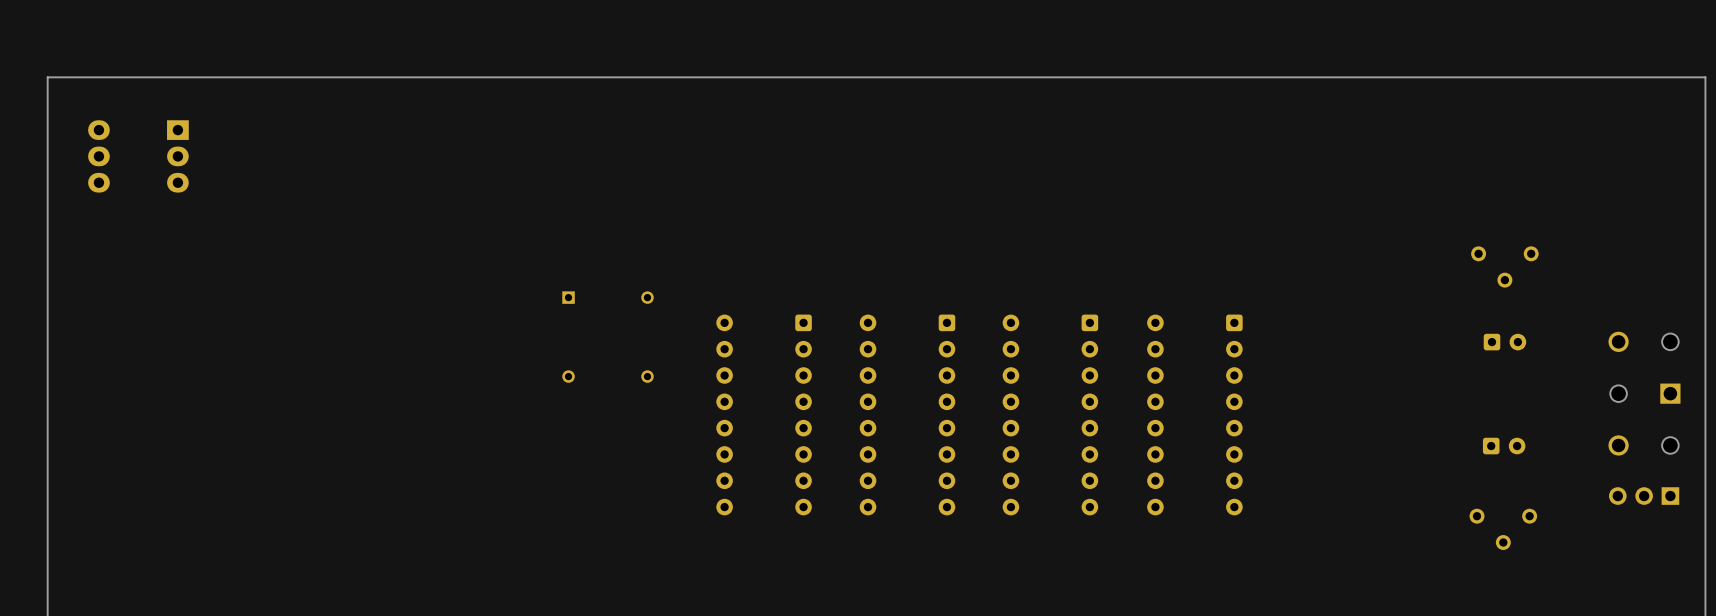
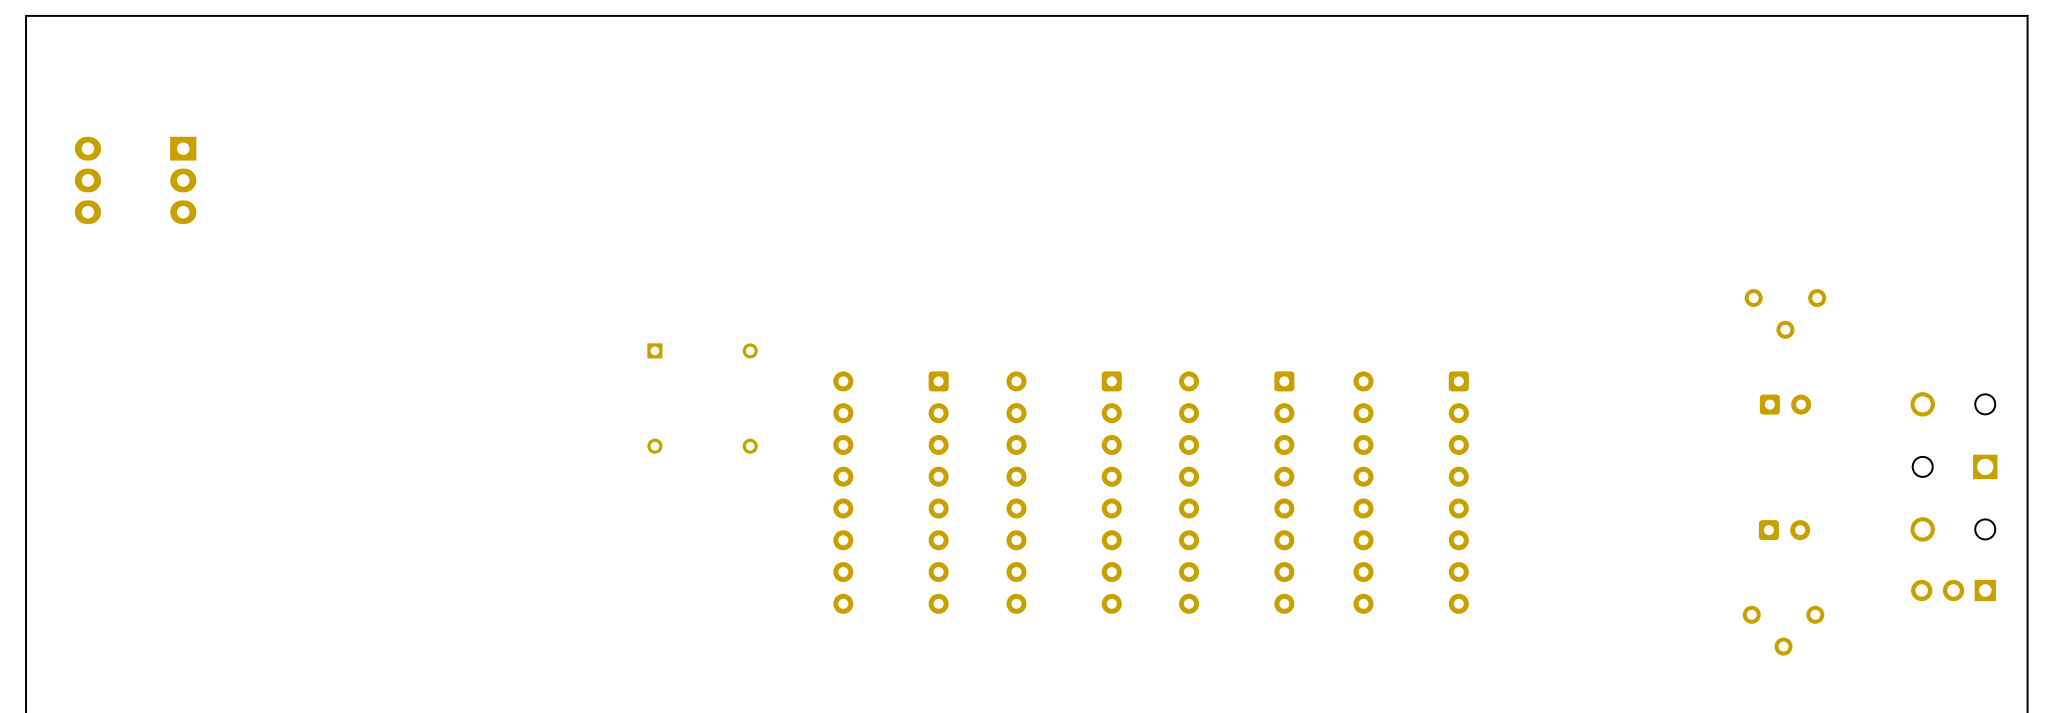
board edge: (1705, 77) (47, 77) -> (2027, 84) (2027, 15) (26, 15) (26, 84)

